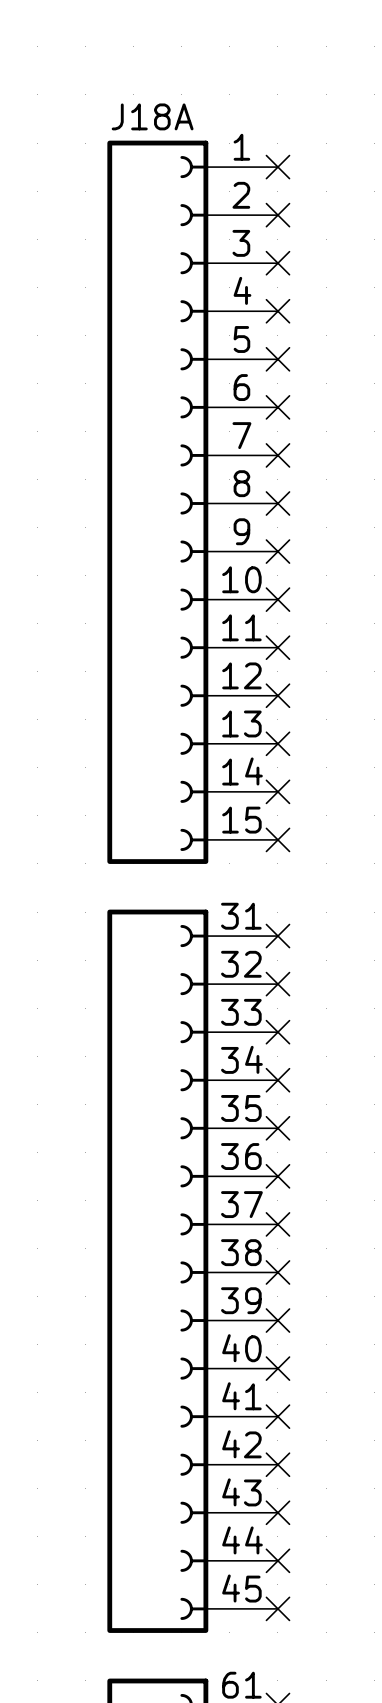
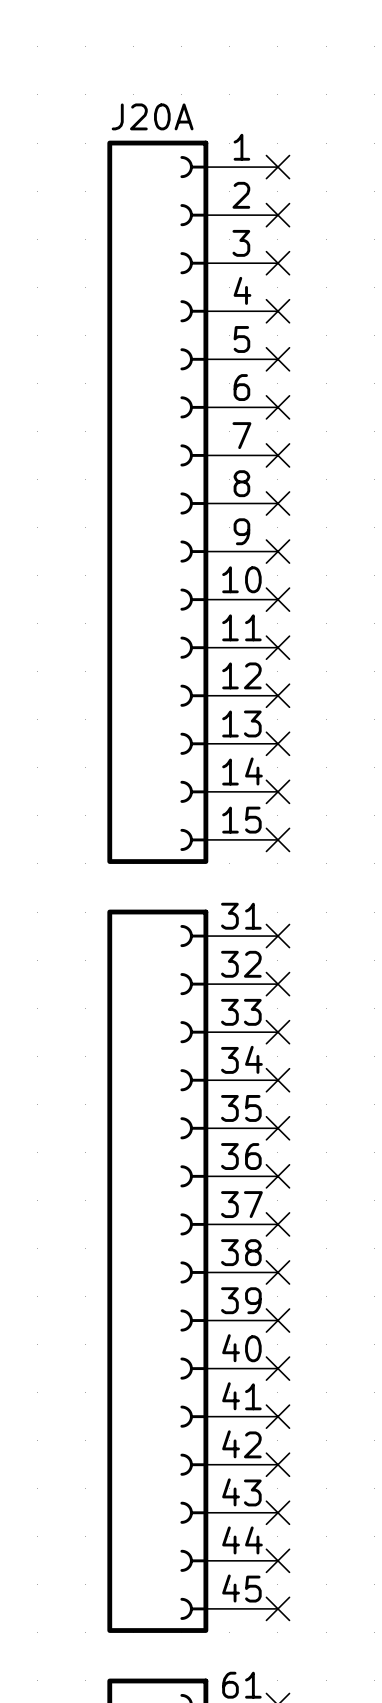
J18A name: J18A (152, 116) -> J20A (152, 116)

